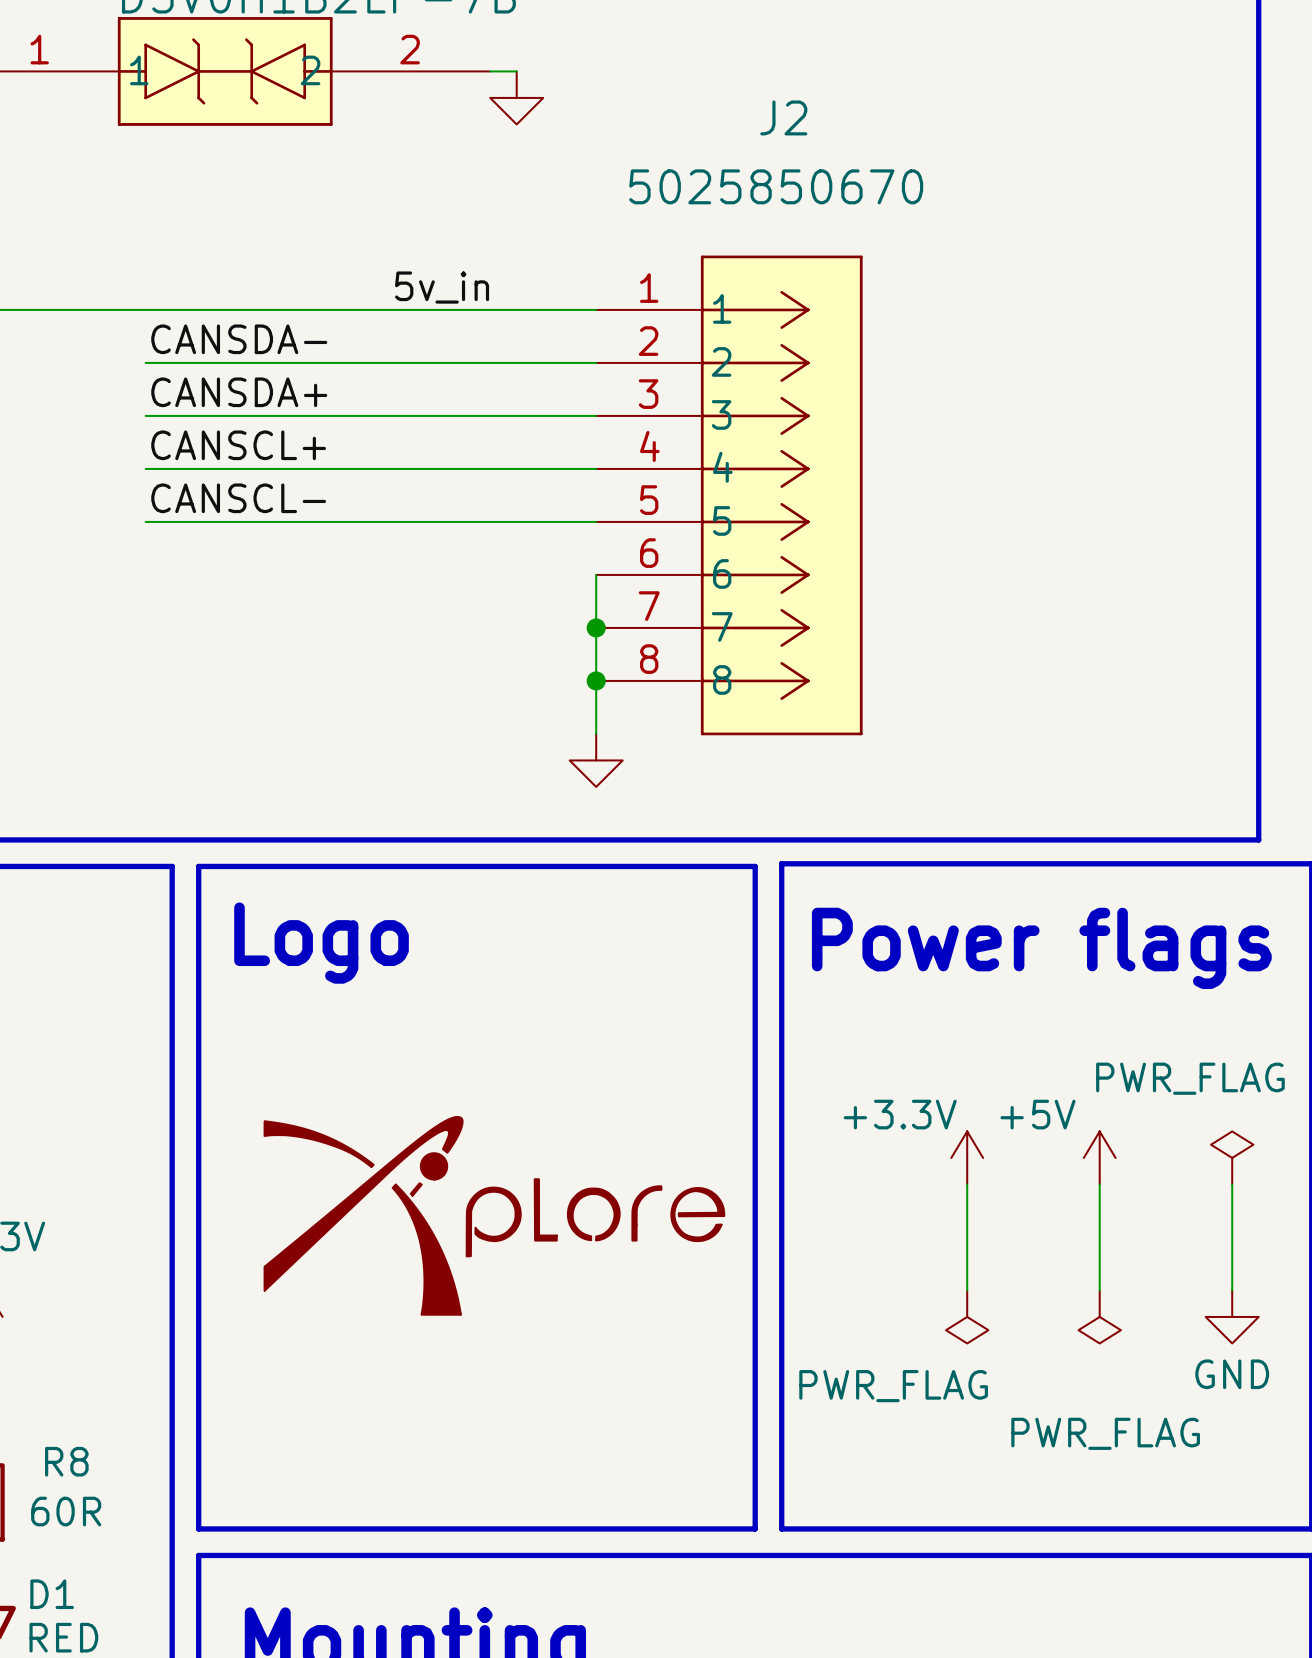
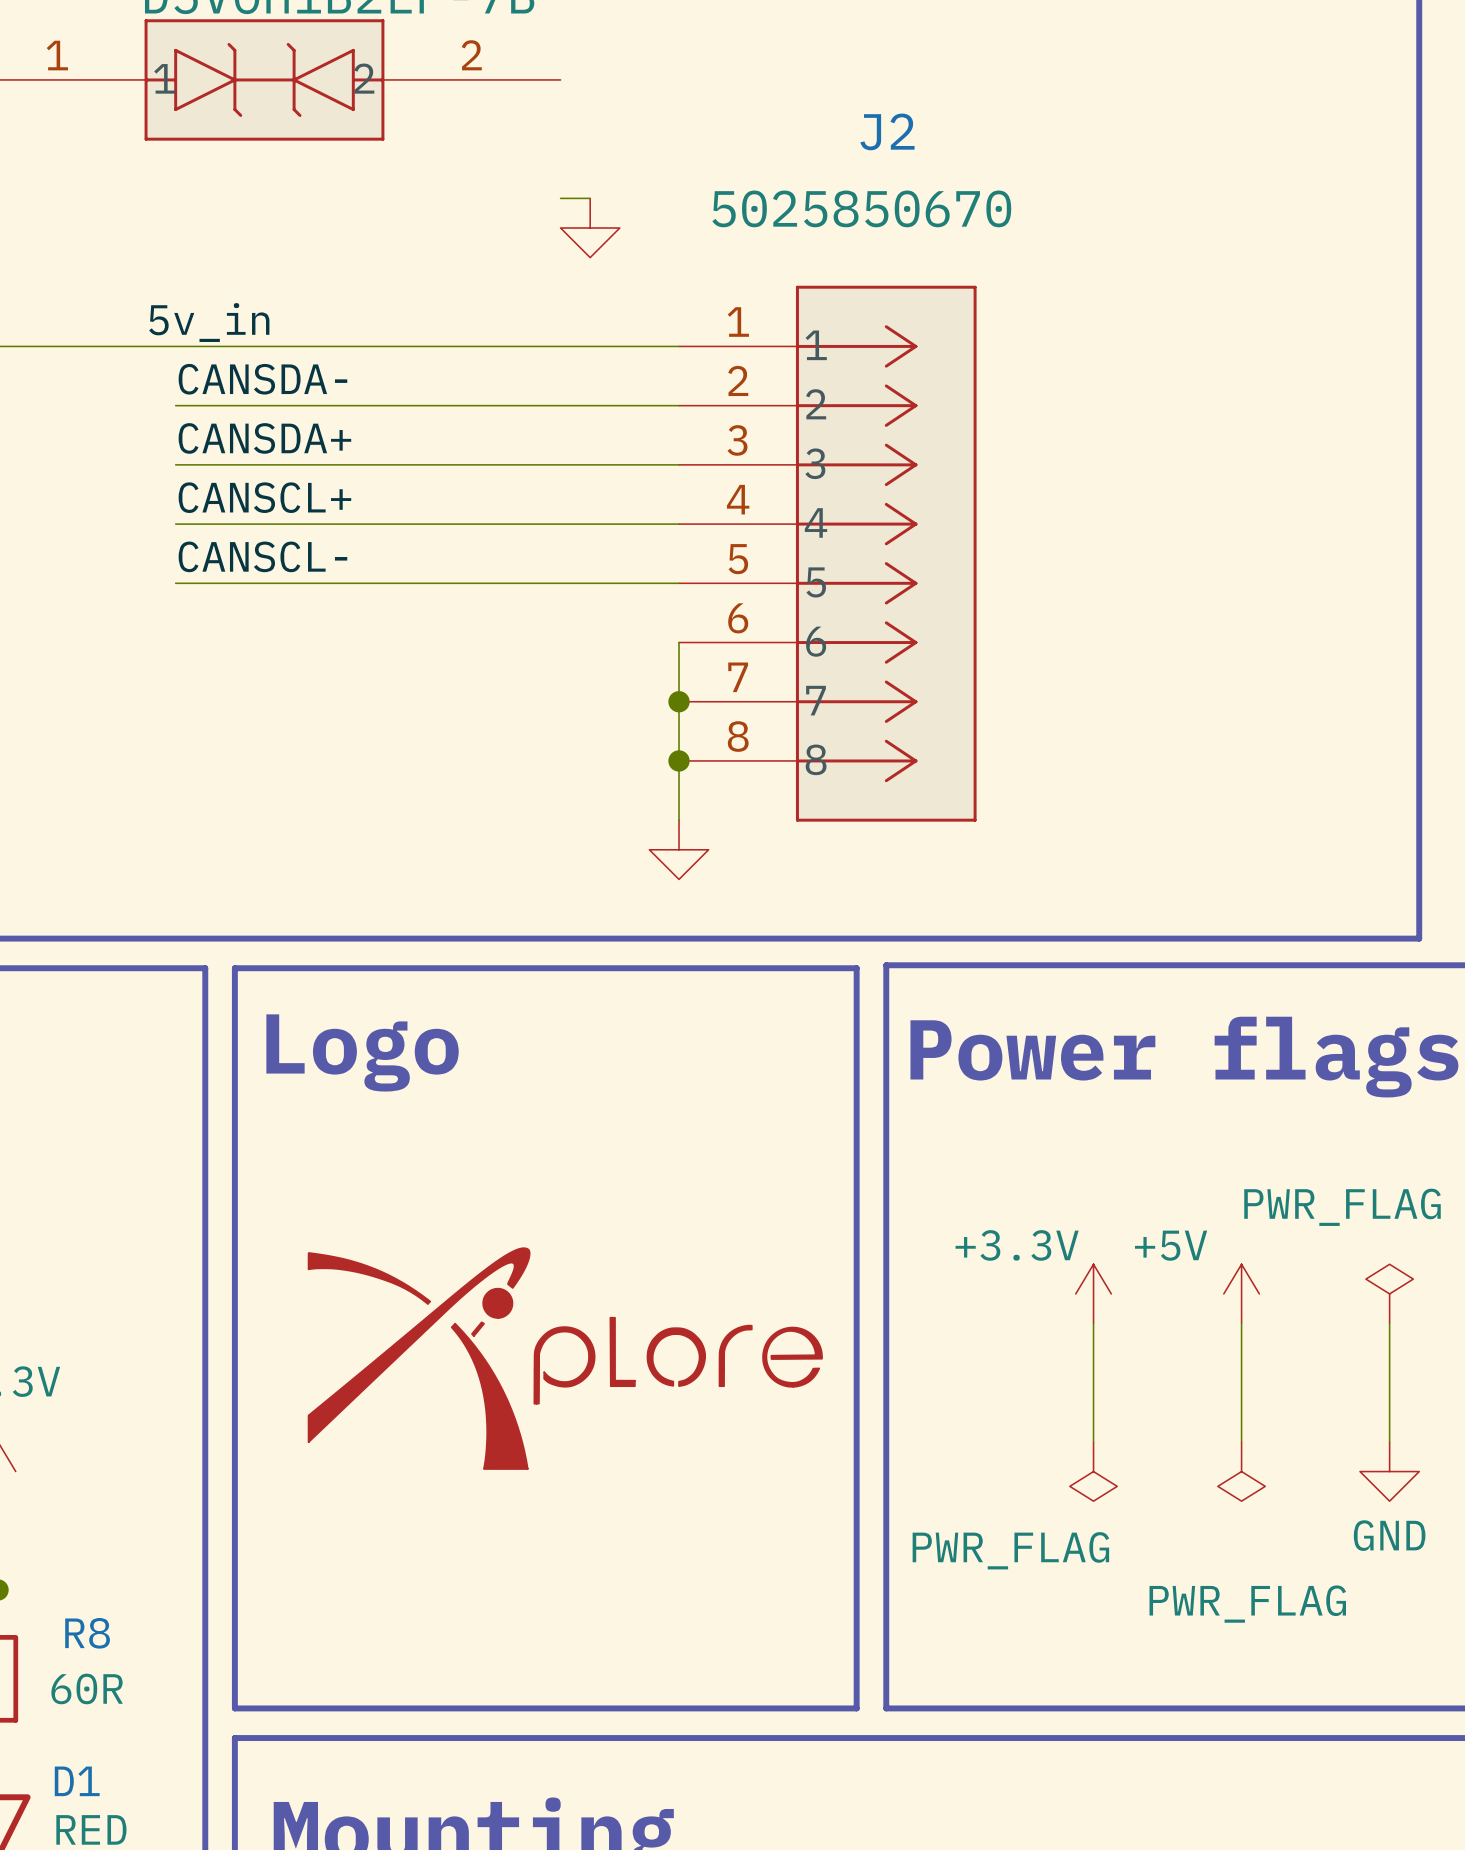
wire: (490, 71) (516, 71) -> (560, 198) (590, 198)
power symbol position: (516, 97) -> (590, 228)
label position: 5v_in (442, 287) -> 5v_in (209, 322)

